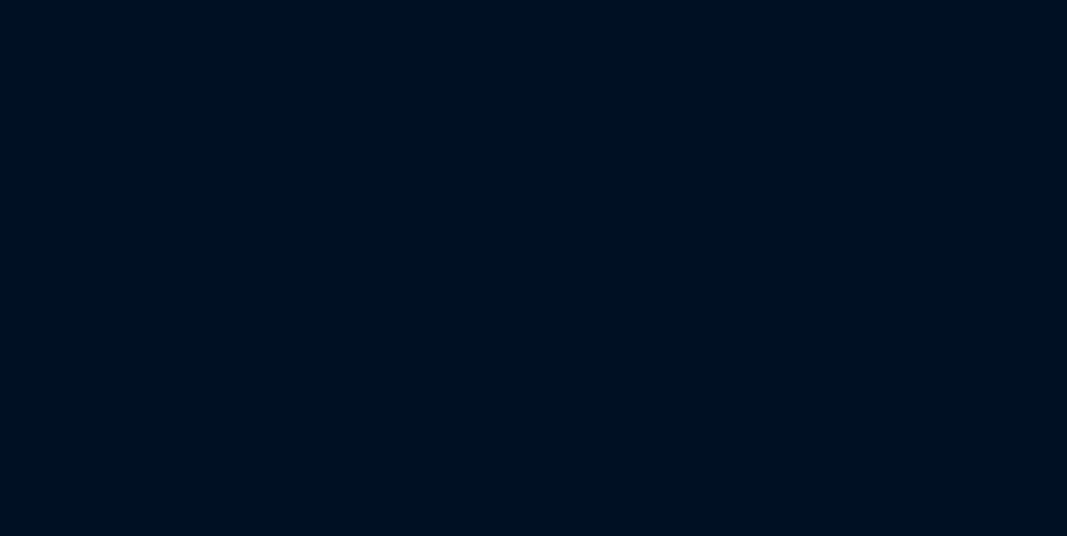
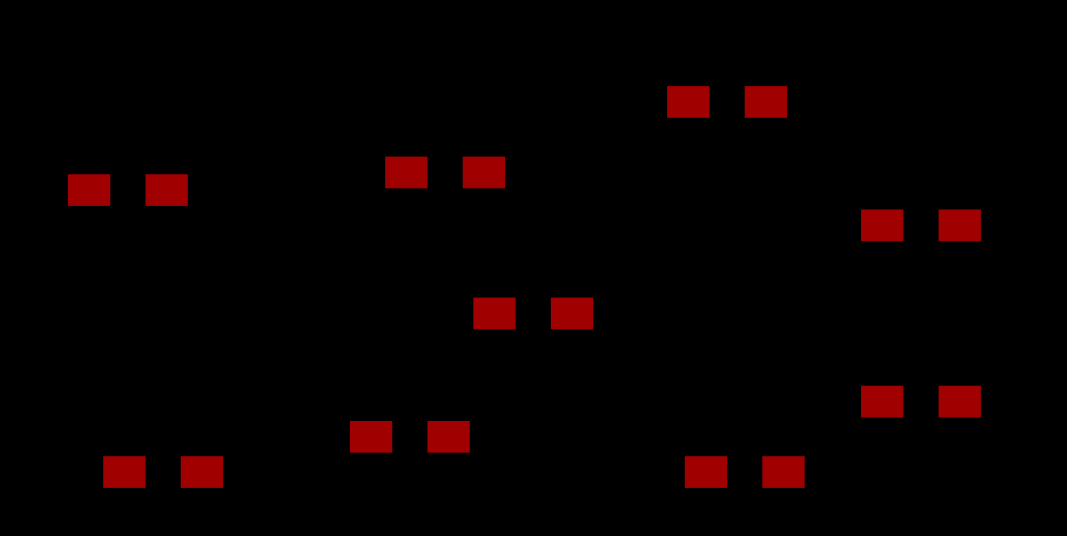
part: none -> (727, 101)
part: none -> (445, 172)
part: none -> (127, 190)
part: none -> (920, 225)
part: none -> (533, 313)
part: none -> (920, 401)
part: none -> (409, 436)
part: none -> (163, 472)
part: none -> (744, 472)

